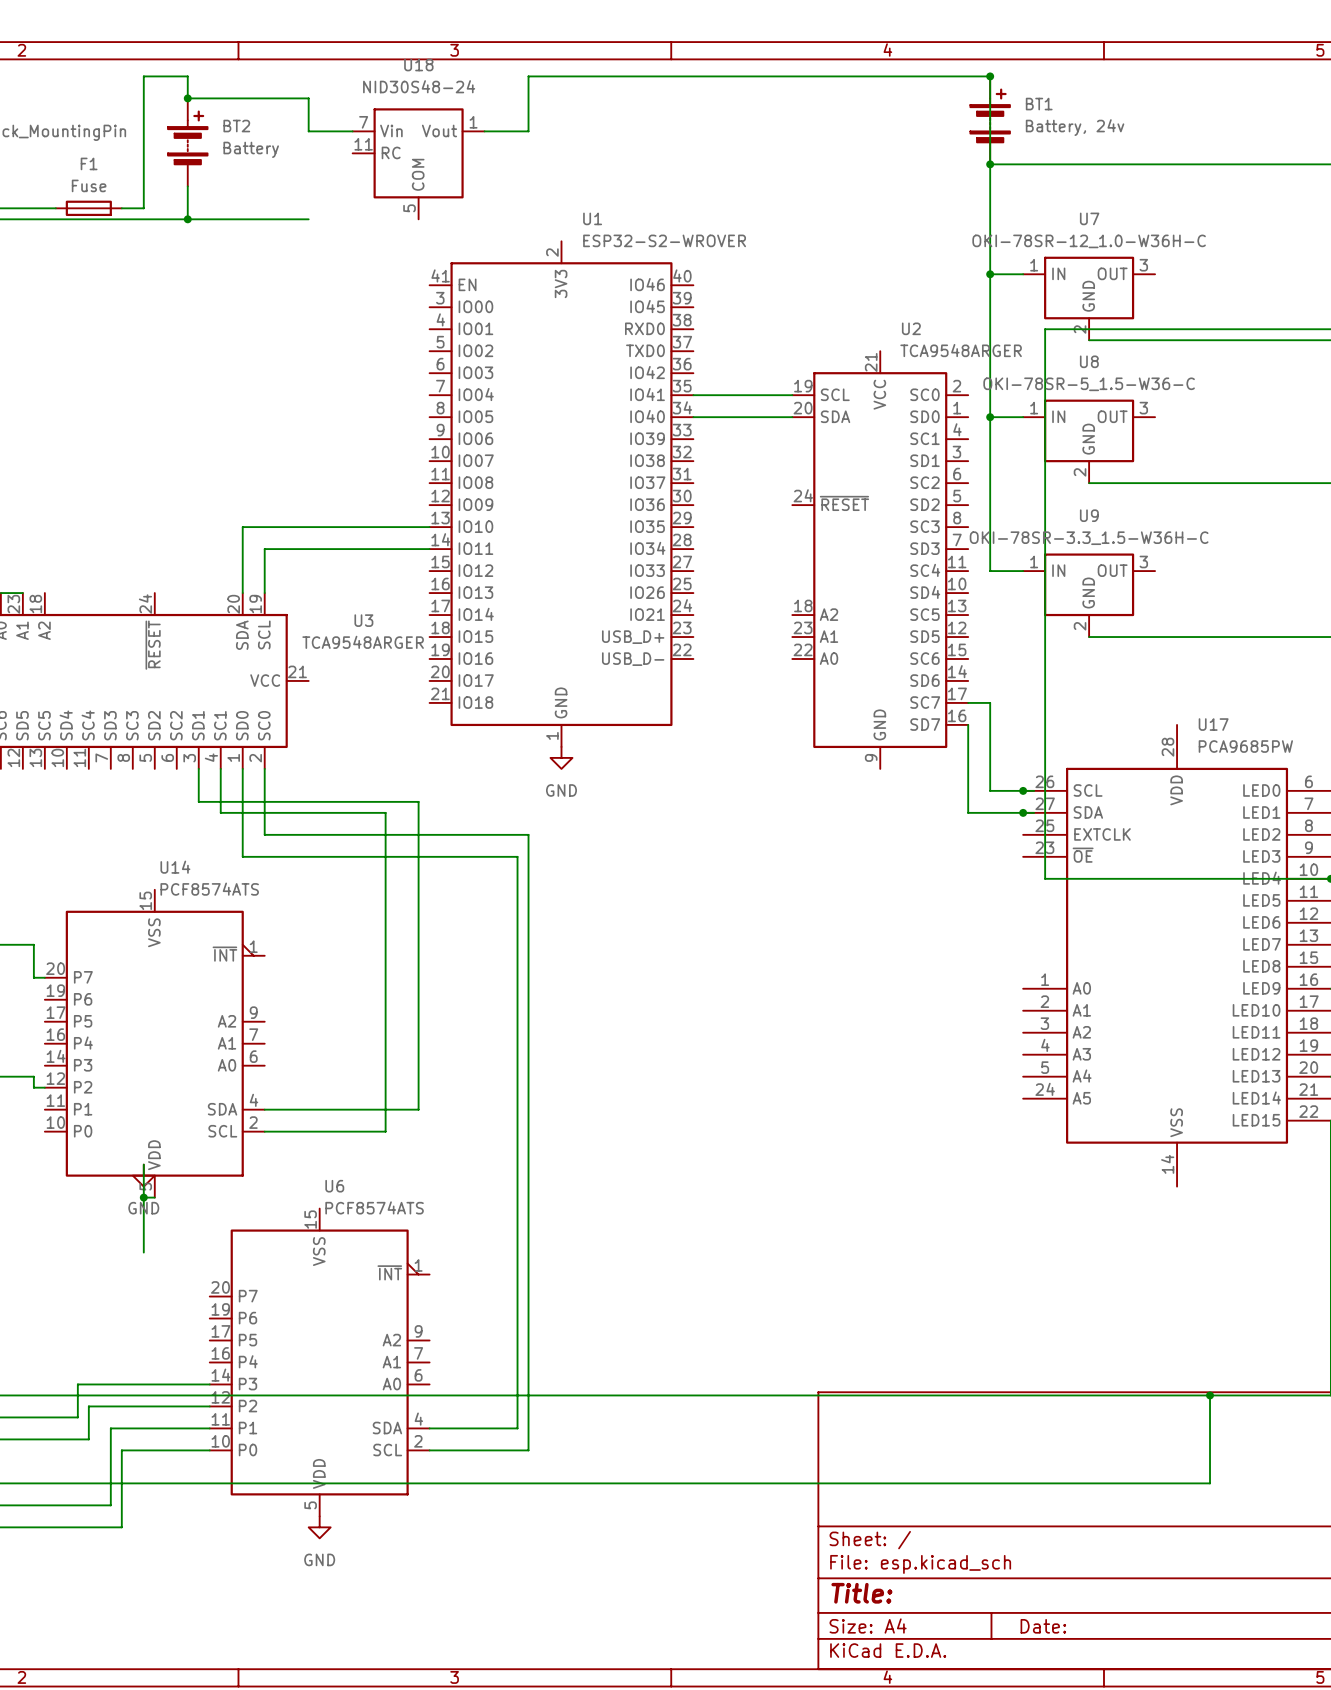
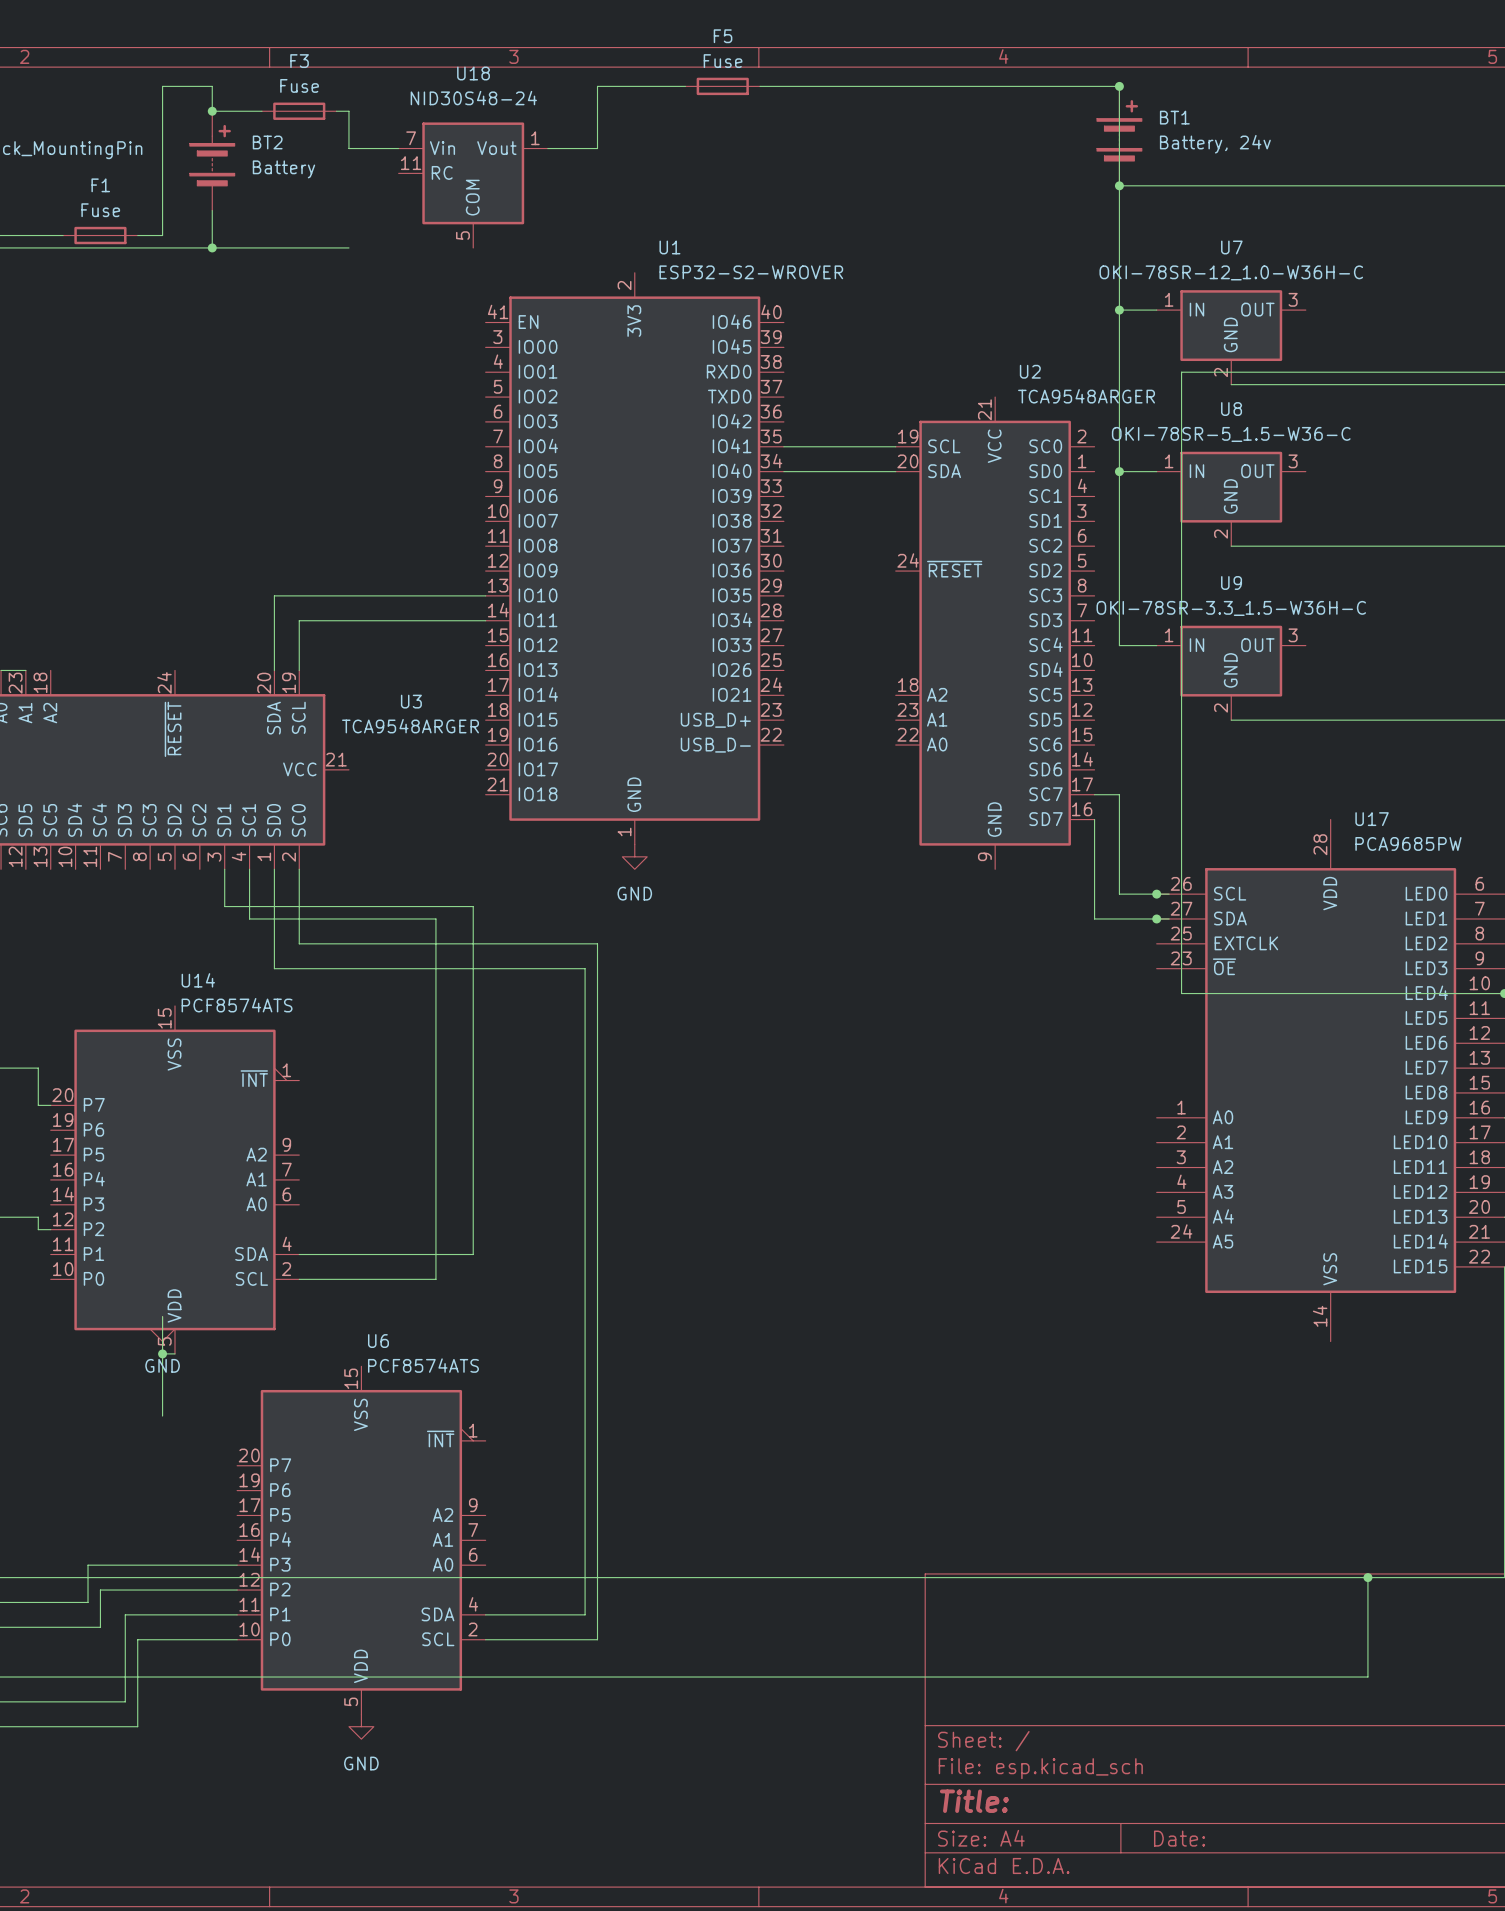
F5: none -> Fuse (722, 86)
F3: none -> Fuse (299, 111)

